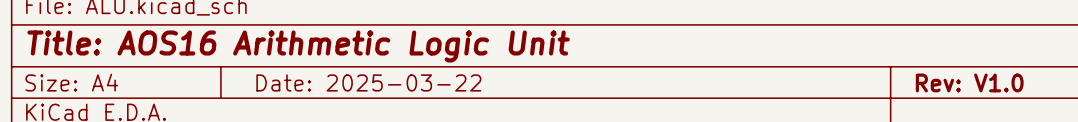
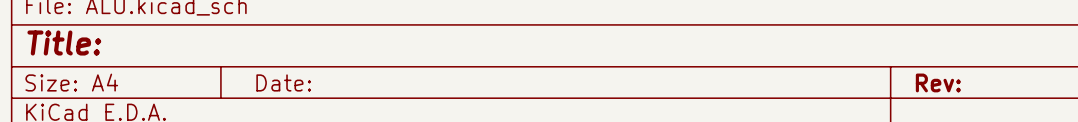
title block: Title: AOS16 Arithmetic Logic Unit (298, 46) -> Title: (64, 42)
title block: Date: 2025-03-22 (368, 82) -> Date: (283, 82)
title block: Rev: V1.0 (969, 82) -> Rev: (938, 82)

